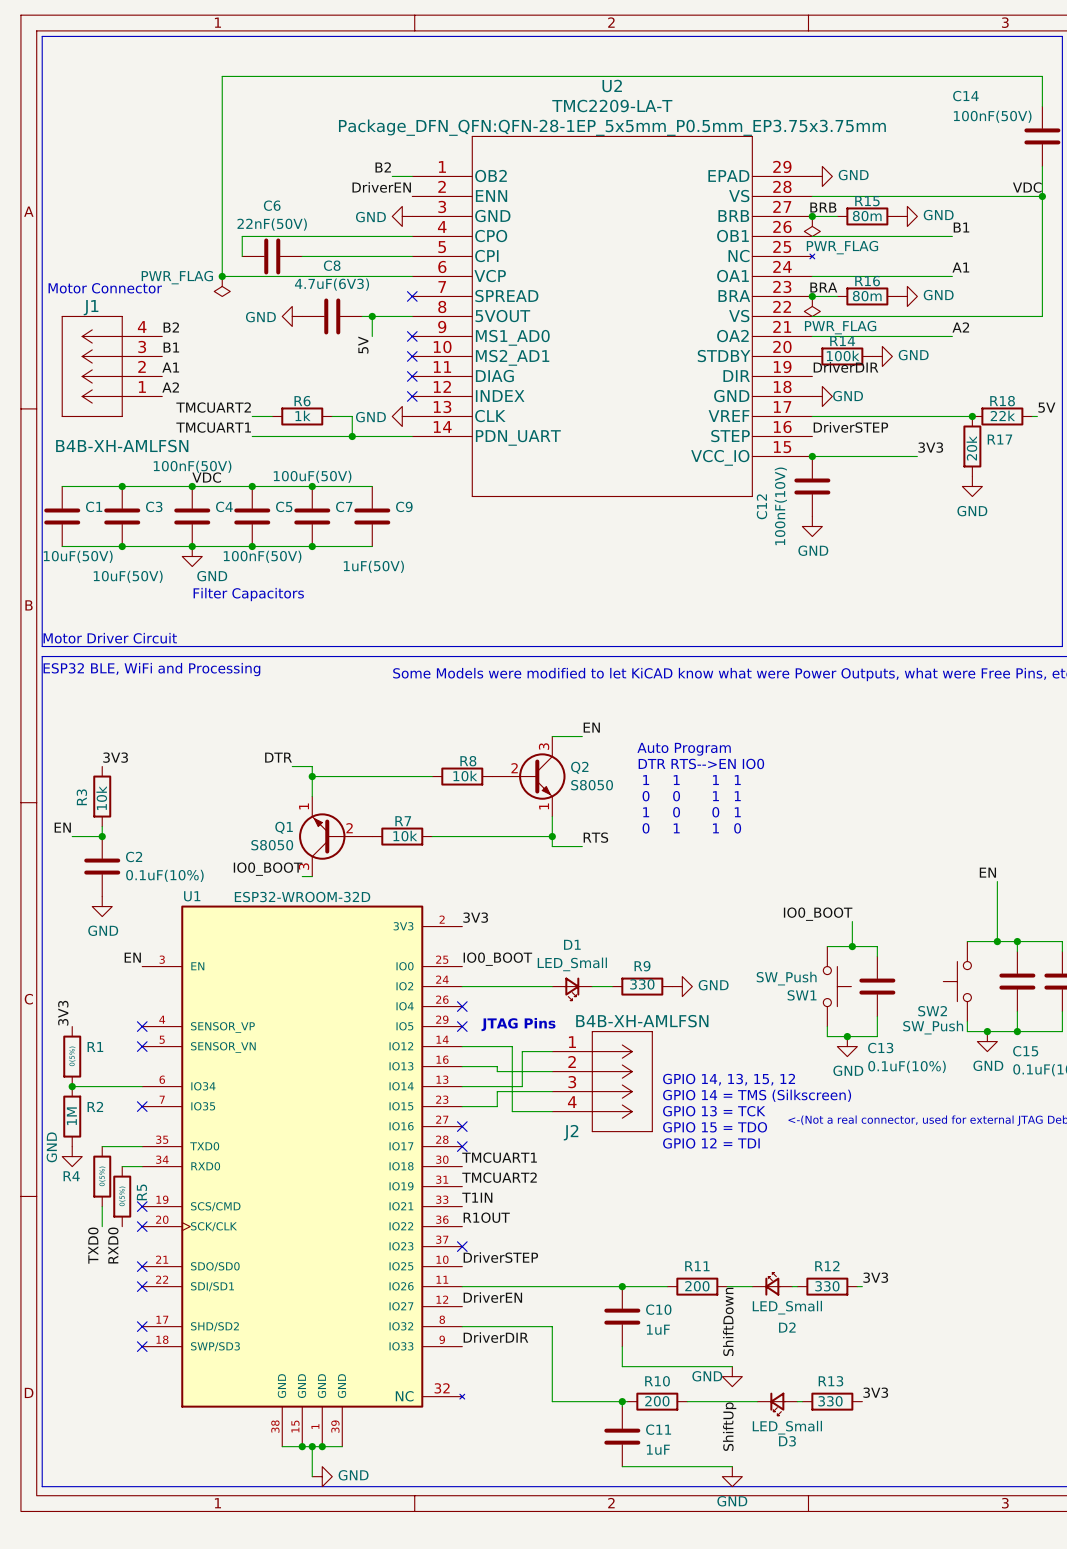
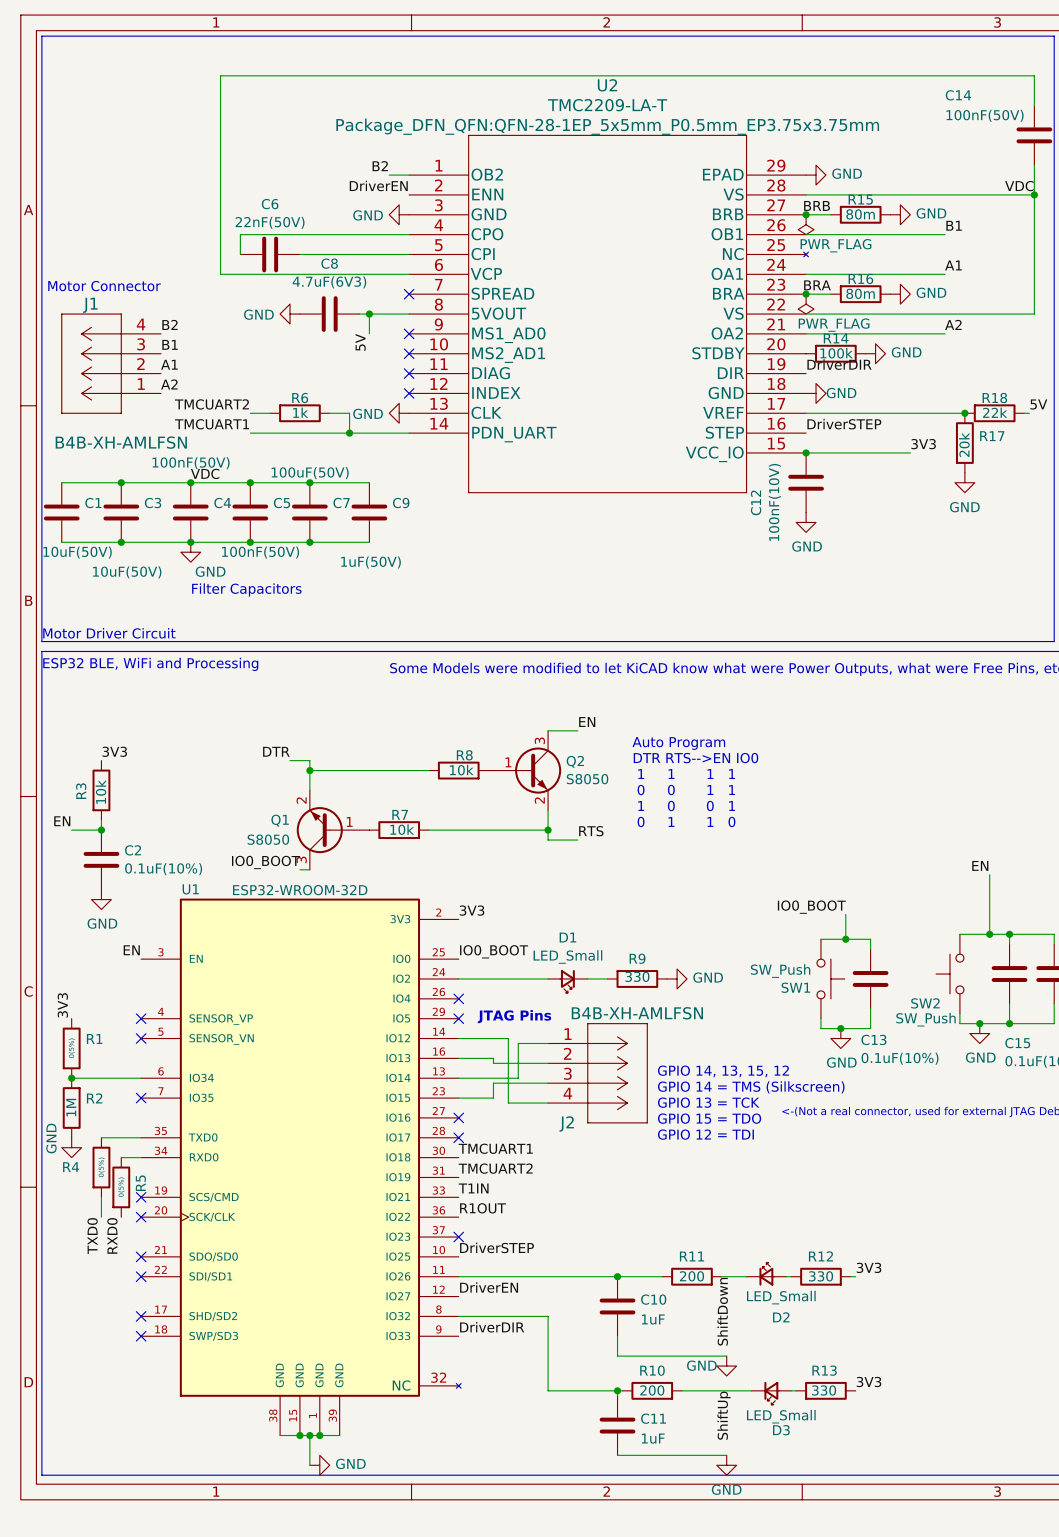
junction: (222, 276) -> none
power symbol: PWR_FLAG (222, 286) -> none
Q2 symbol: [492, 736, 566, 817] -> [488, 730, 562, 811]
Q1 symbol: [299, 796, 373, 877] -> [296, 790, 370, 870]

